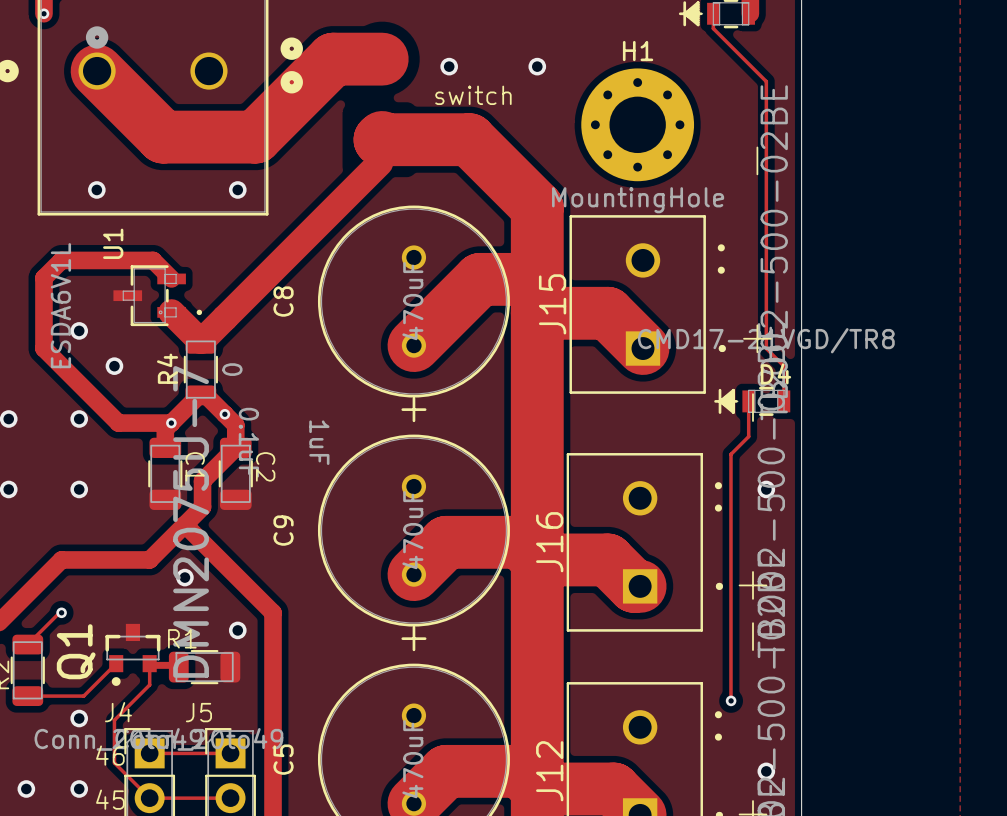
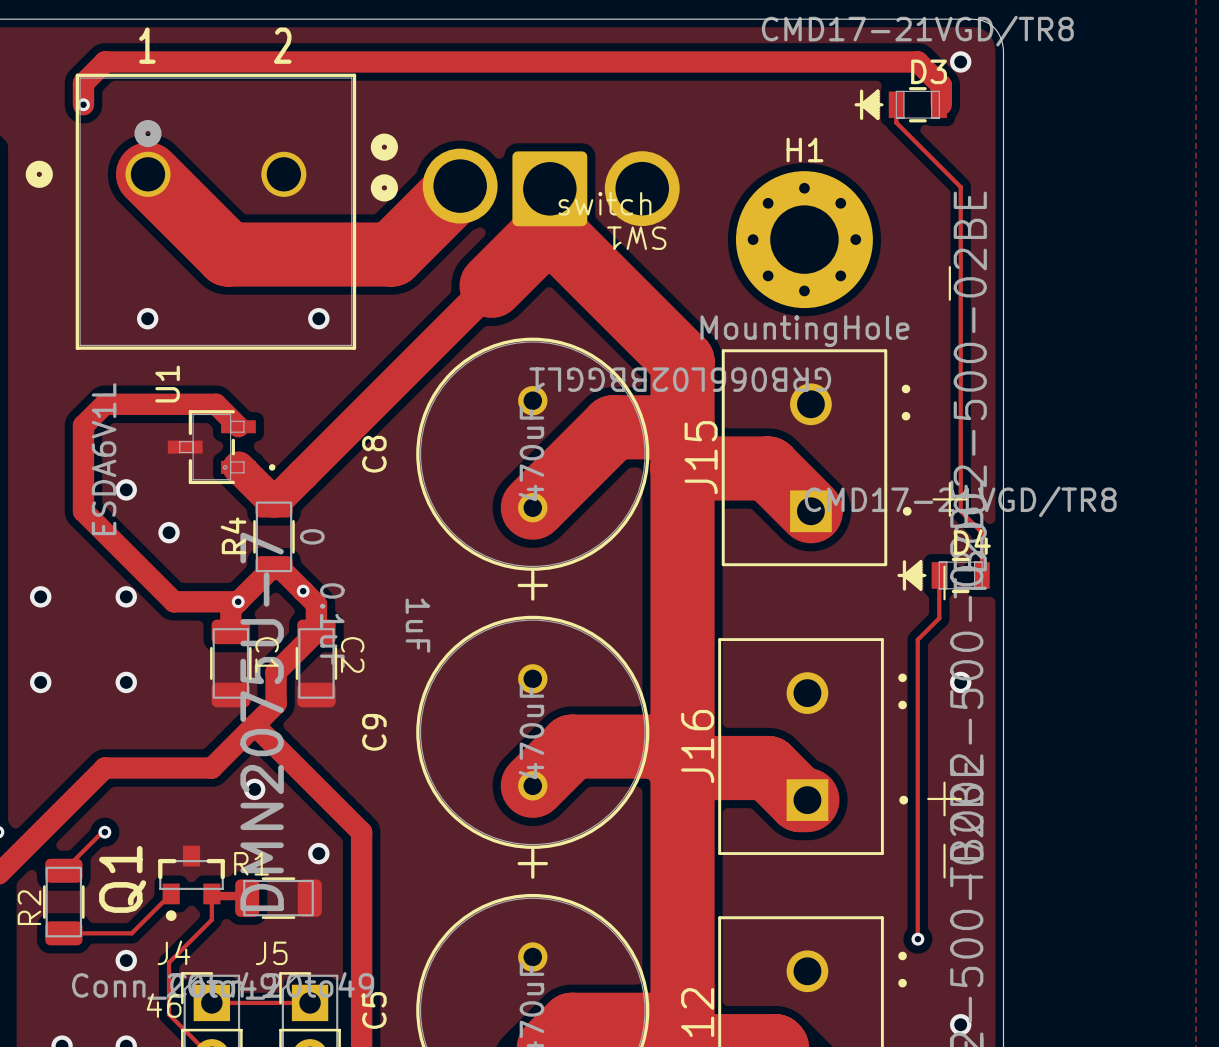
track: (382, 59) (333, 59) (255, 137) -> (460, 186) (391, 254) (340, 254)
via: (449, 66) -> none
via: (537, 66) -> none
SW1: none -> GRB066L02BBGGL1 (551, 187)
track: none -> (549, 228) (491, 285)
track: (382, 137) (379, 139) (469, 139) (537, 207) (537, 225) -> (549, 228) (682, 361)

